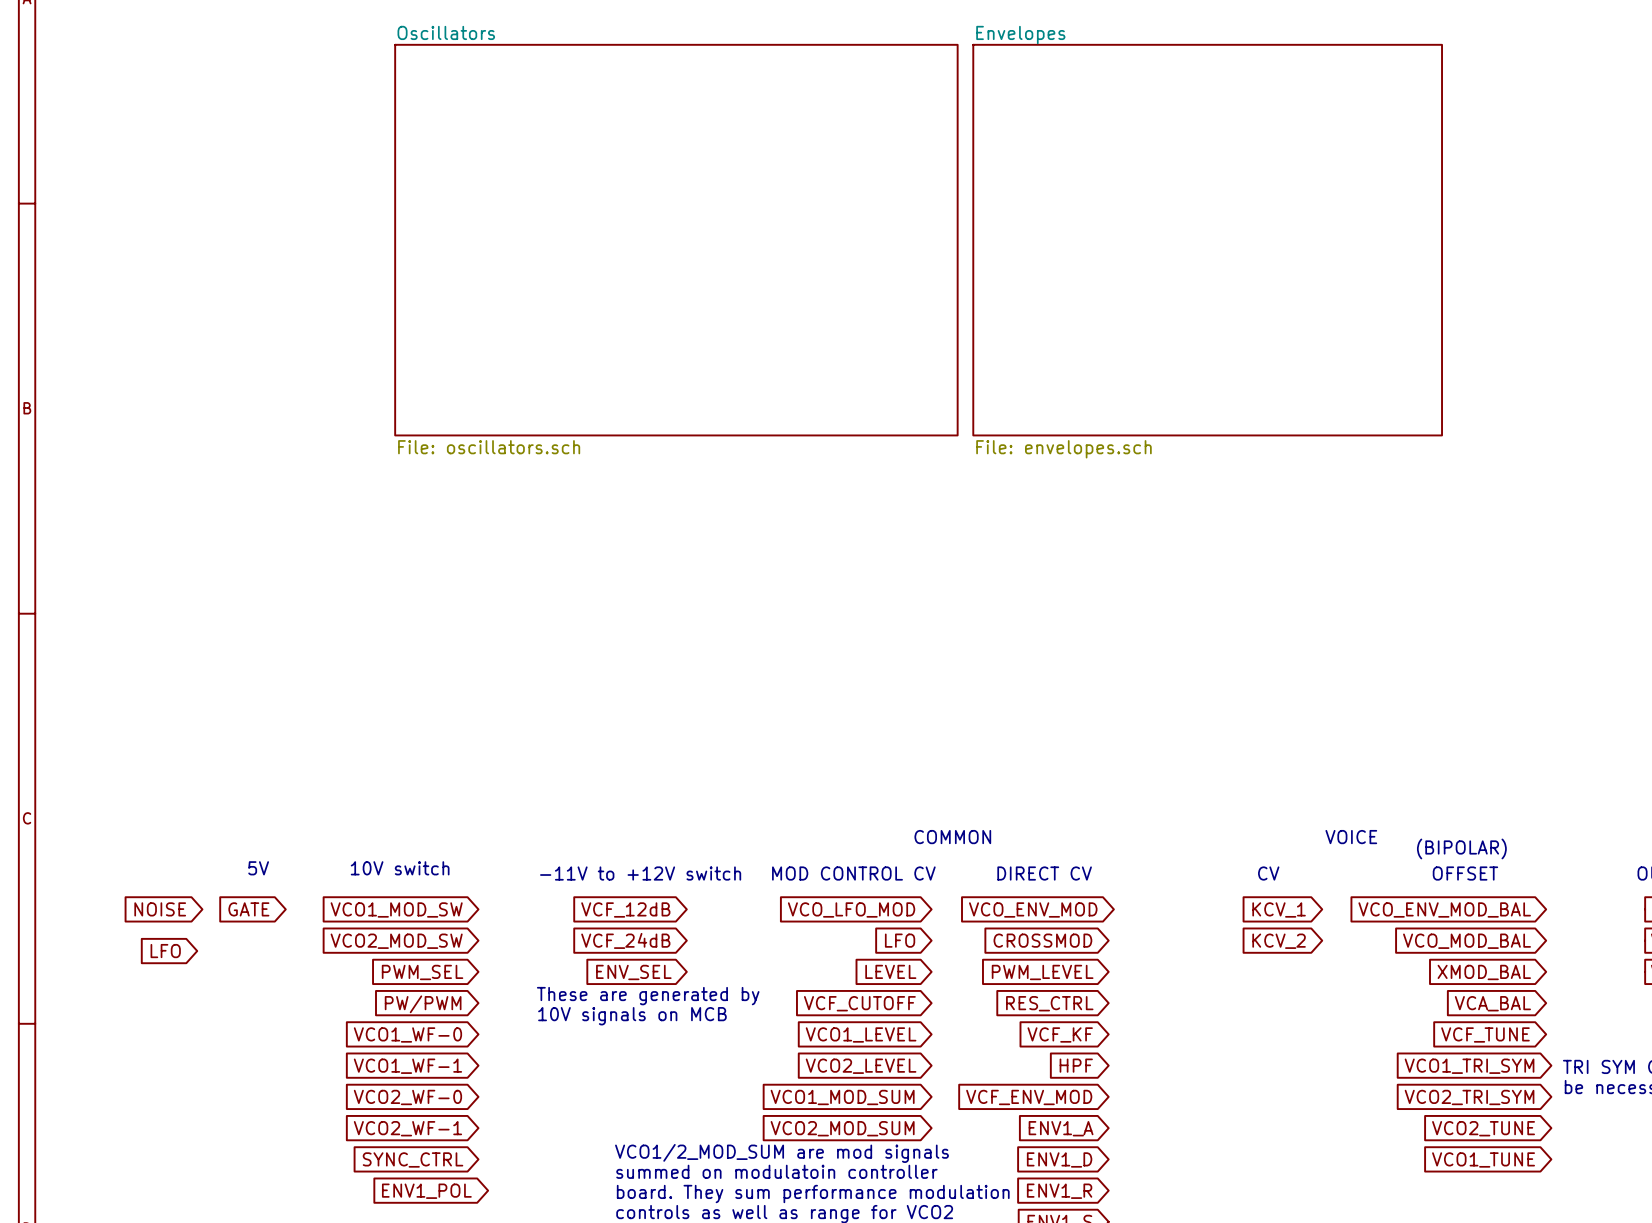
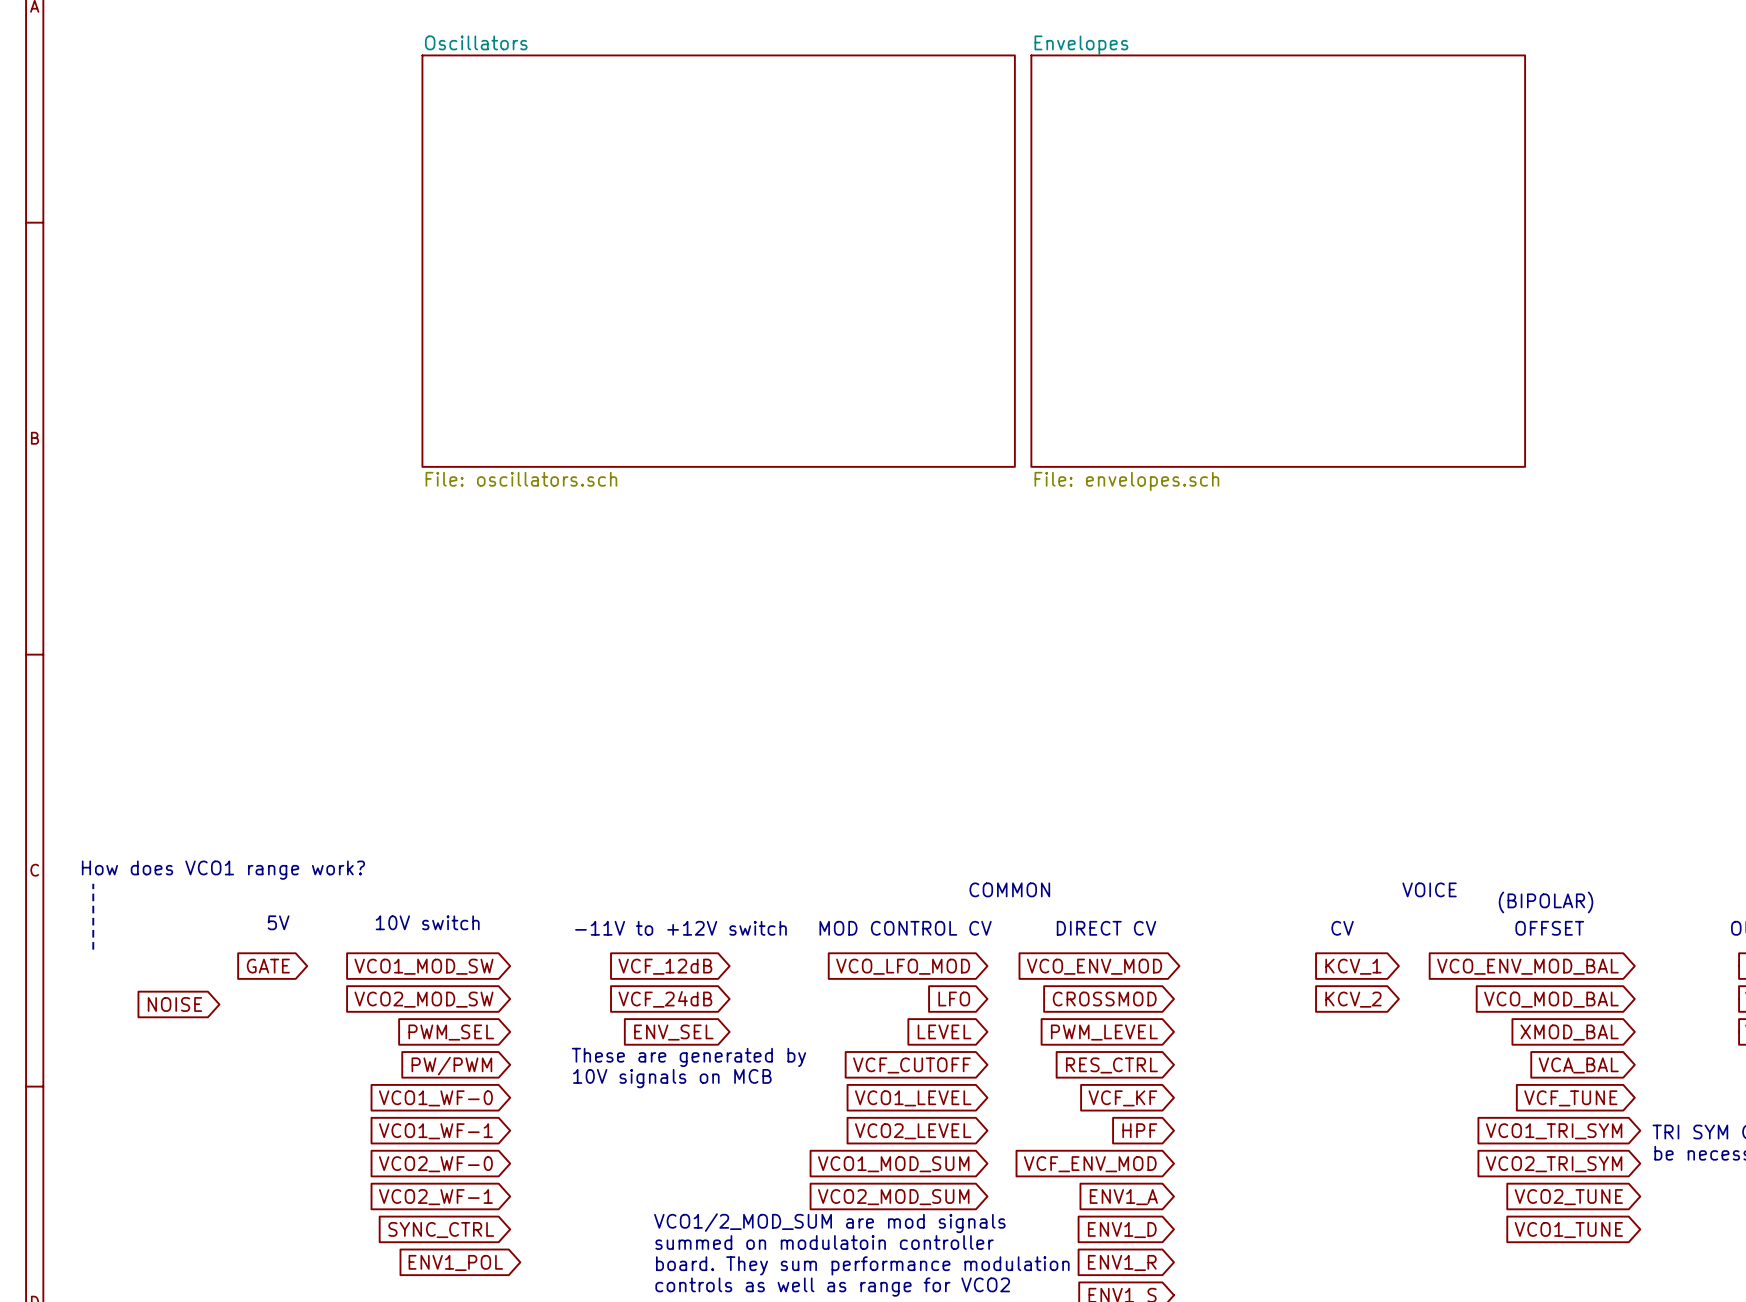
text: none -> How does VCO1 range work? (223, 870)
line: none -> (93, 883) (93, 949)
global label: NOISE (160, 909) -> none
global label: LFO (165, 951) -> NOISE (174, 1004)

